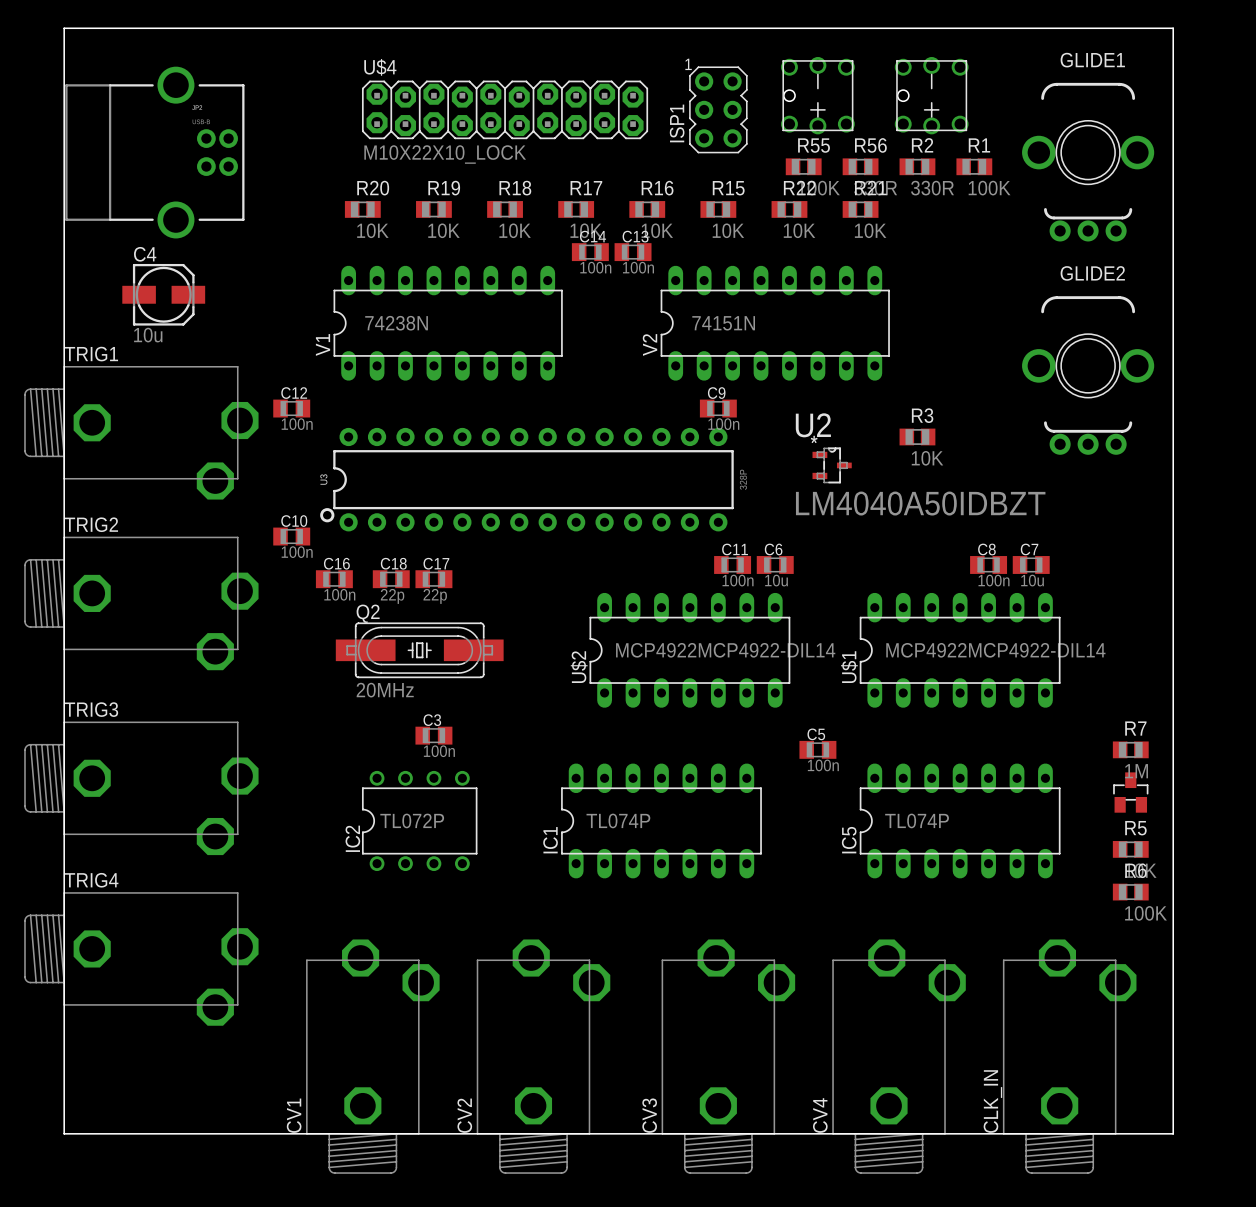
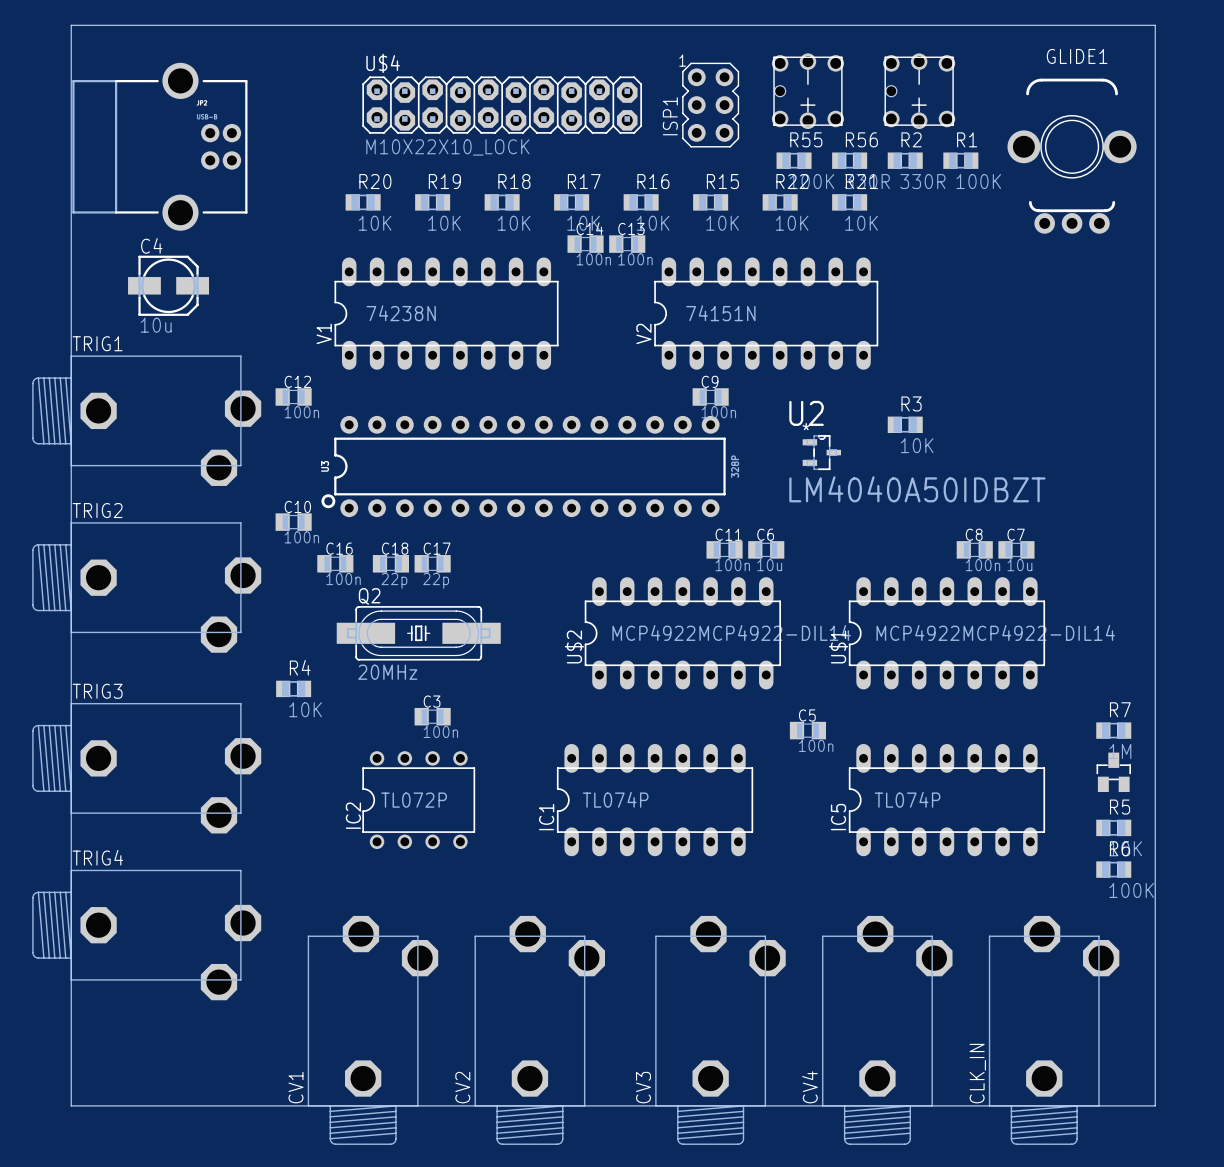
GLIDE2: (1088, 375) -> none
R4: none -> 10K (293, 688)

